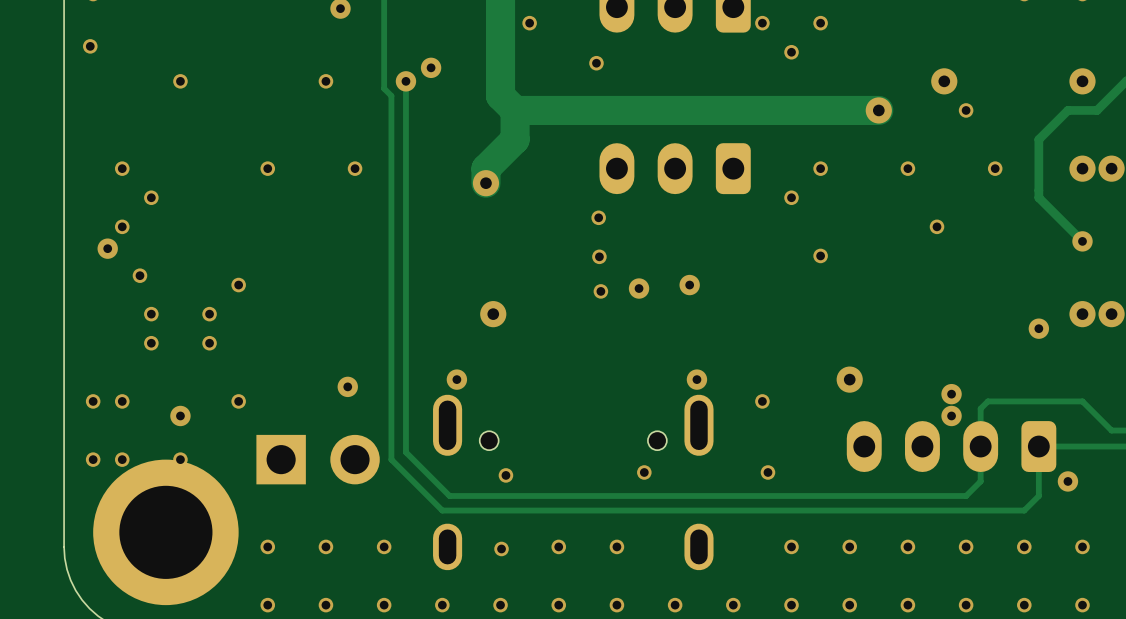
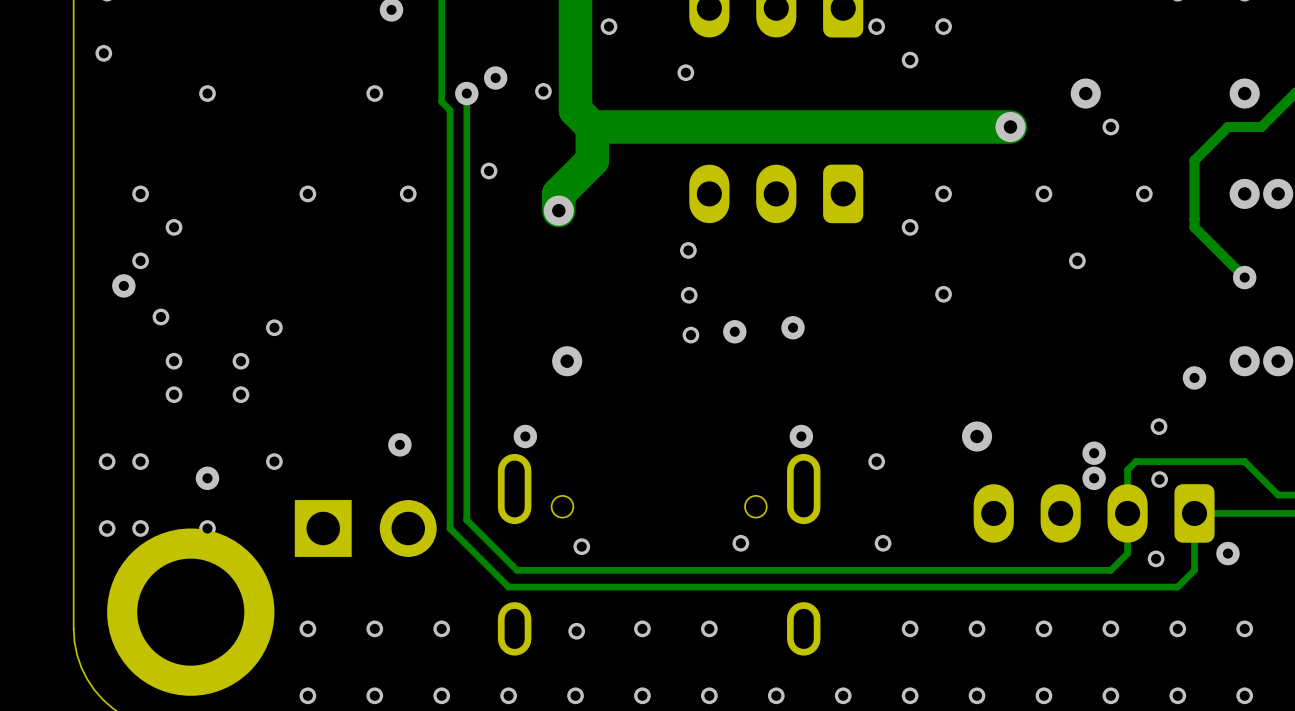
via: none -> (543, 91)
via: none -> (489, 171)
via: none -> (1159, 426)
via: none -> (1159, 479)
via: none -> (1156, 558)

